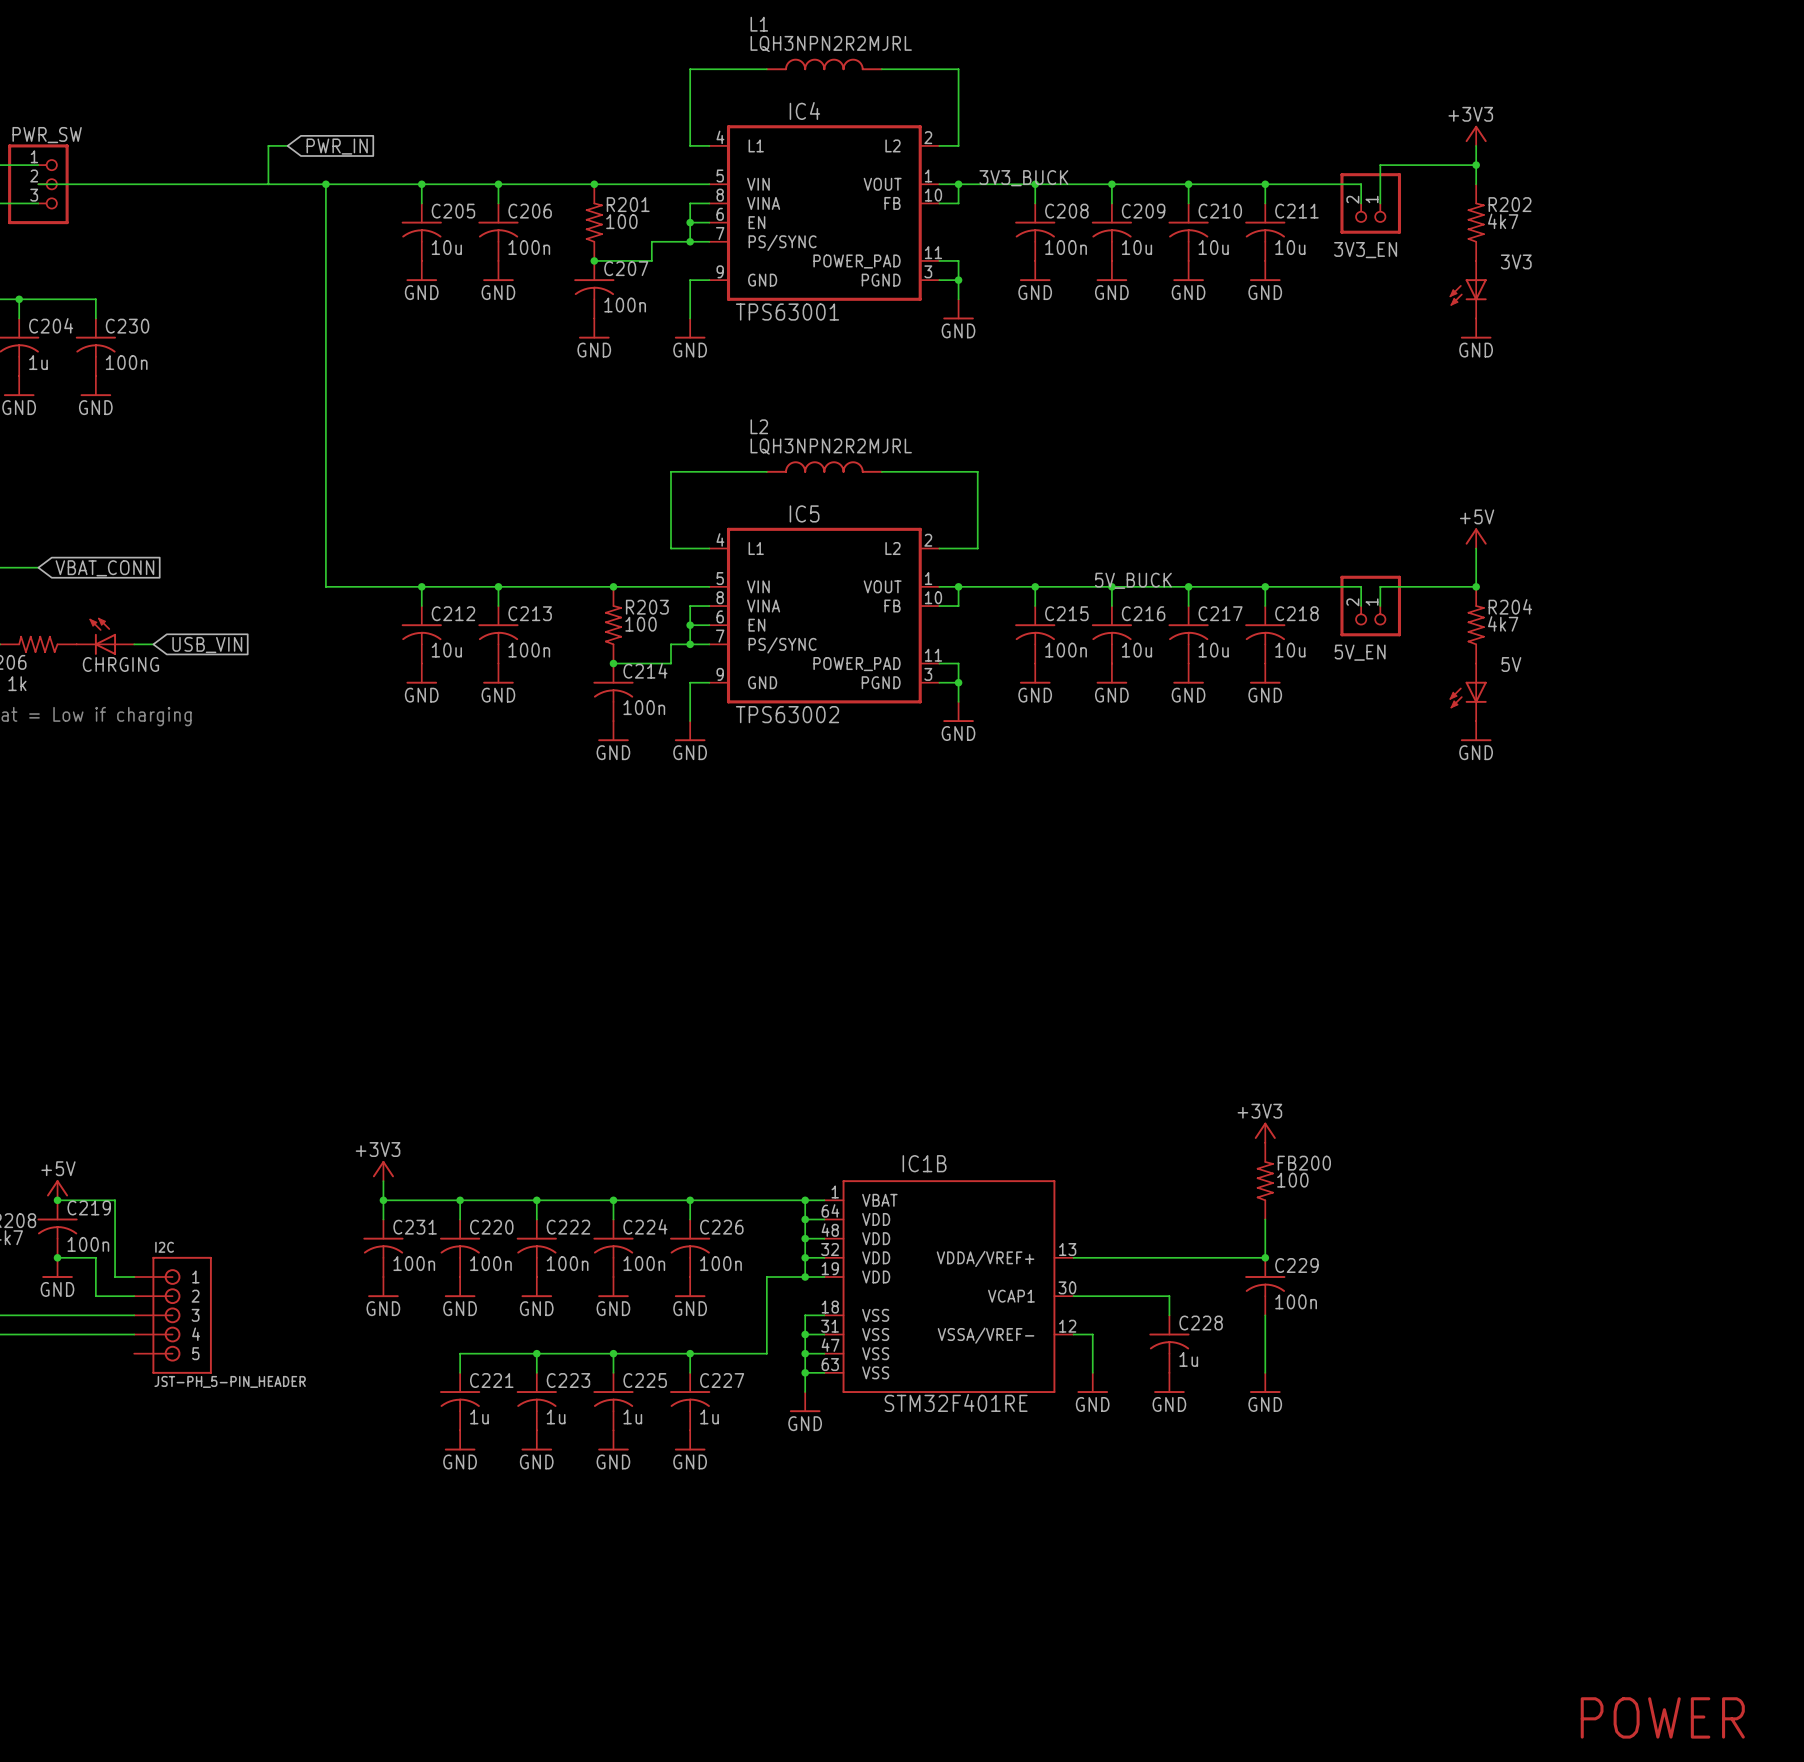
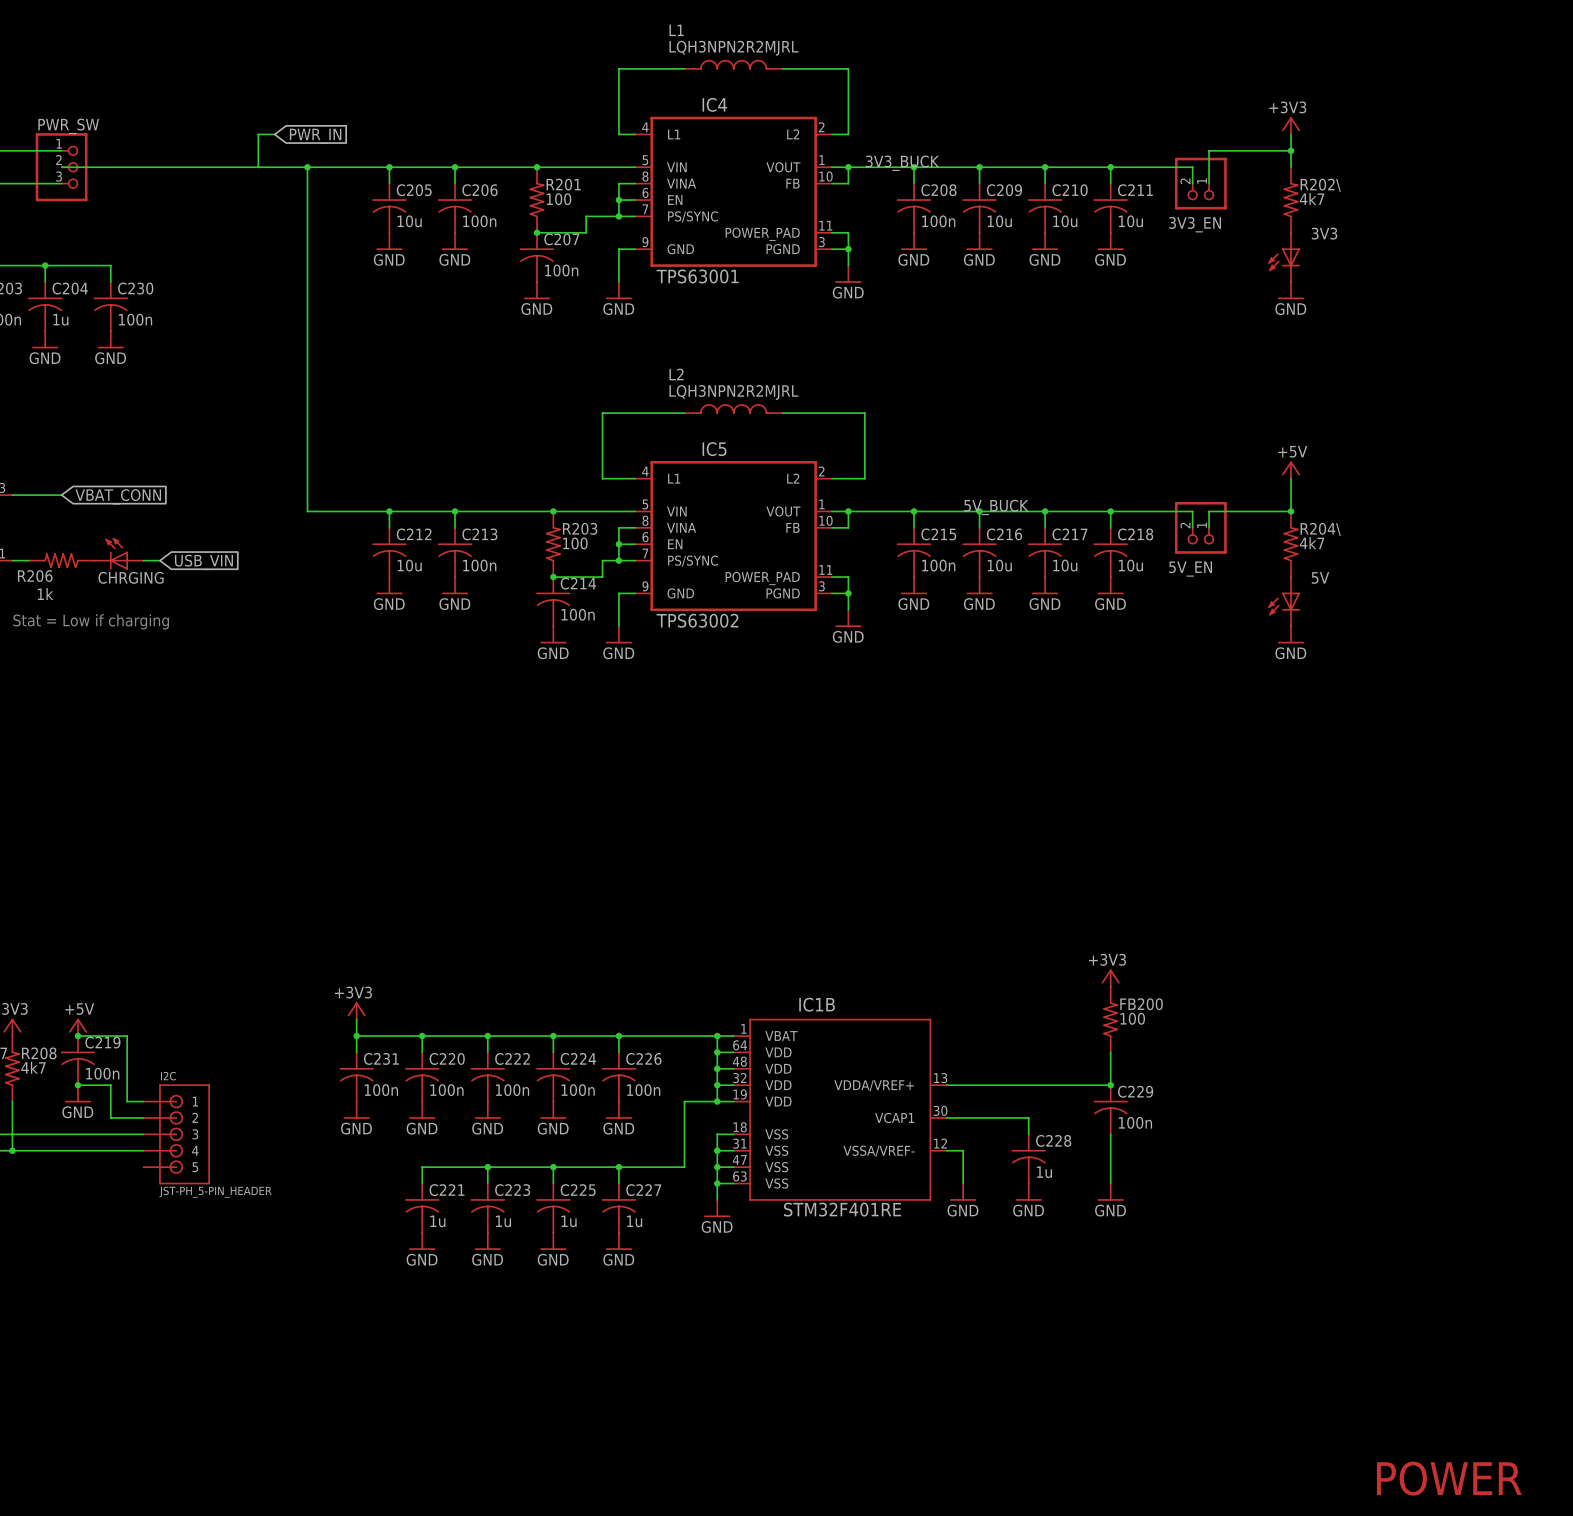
R202 name: R202 (1510, 204) -> R202\ (1320, 185)
R204 name: R204 (1510, 606) -> R204\ (1320, 529)

